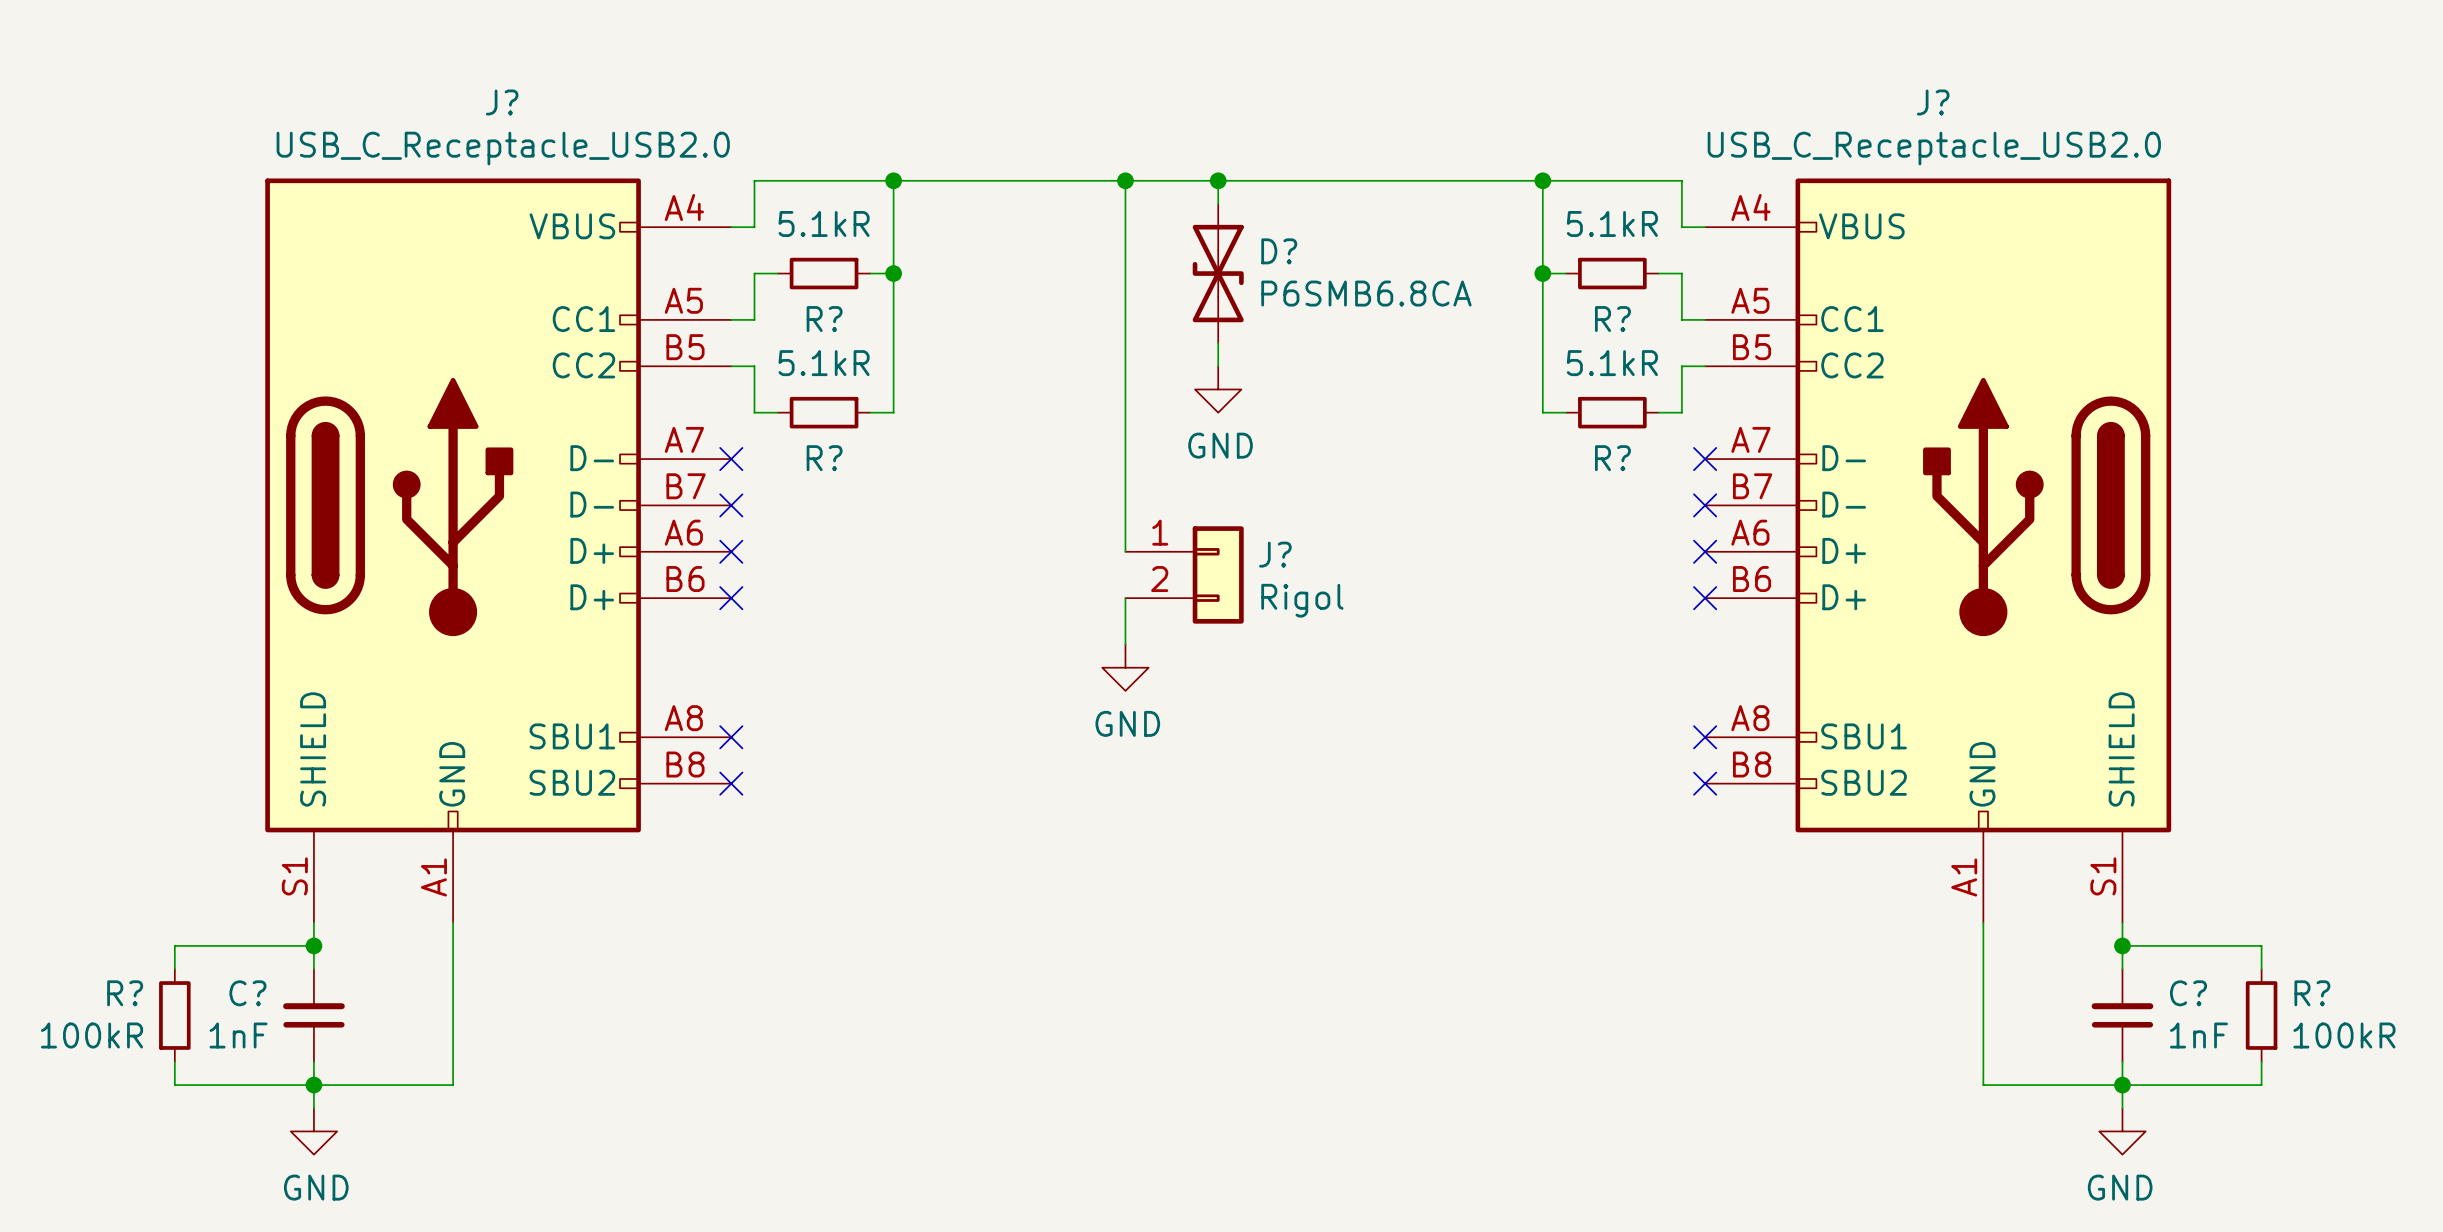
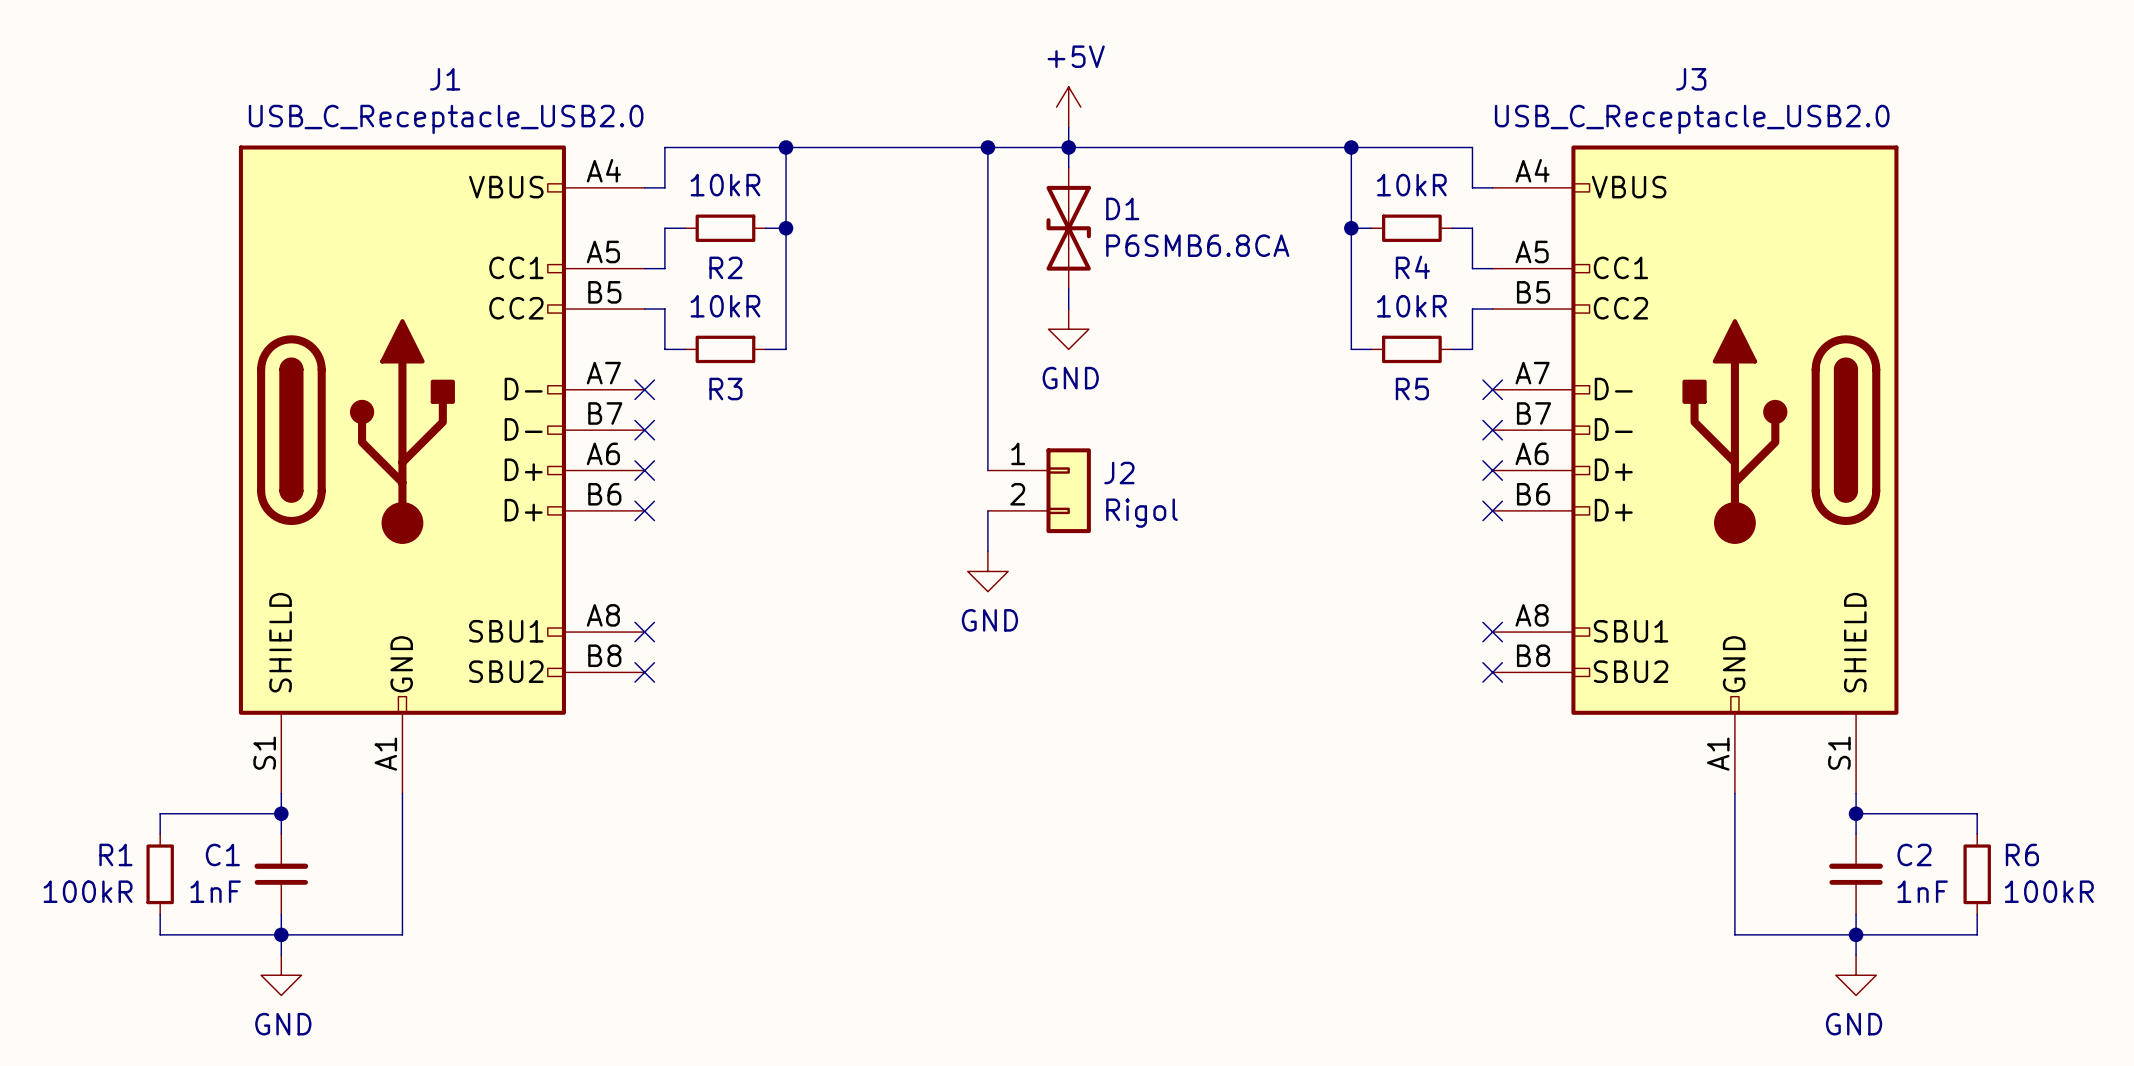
J? name: J? (502, 102) -> J1 (445, 79)
J? name: J? (1933, 102) -> J3 (1691, 79)
power symbol: none -> +5V (1068, 107)
wire: none -> (1068, 127) (1068, 147)
R? value: 5.1kR (824, 223) -> 10kR (725, 185)
R? value: 5.1kR (1612, 223) -> 10kR (1411, 185)
D? name: D? (1279, 251) -> D1 (1122, 208)
R? name: R? (824, 319) -> R2 (725, 267)
R? name: R? (1612, 319) -> R4 (1412, 267)
R? value: 5.1kR (824, 363) -> 10kR (725, 306)
R? value: 5.1kR (1612, 363) -> 10kR (1411, 306)
R? name: R? (824, 458) -> R3 (725, 389)
R? name: R? (1612, 458) -> R5 (1412, 389)
J? name: J? (1275, 554) -> J2 (1119, 473)
R? name: R? (125, 993) -> R1 (115, 854)
C? name: C? (247, 993) -> C1 (222, 854)
C? name: C? (2188, 993) -> C2 (1914, 854)
R? name: R? (2312, 993) -> R6 (2022, 854)

